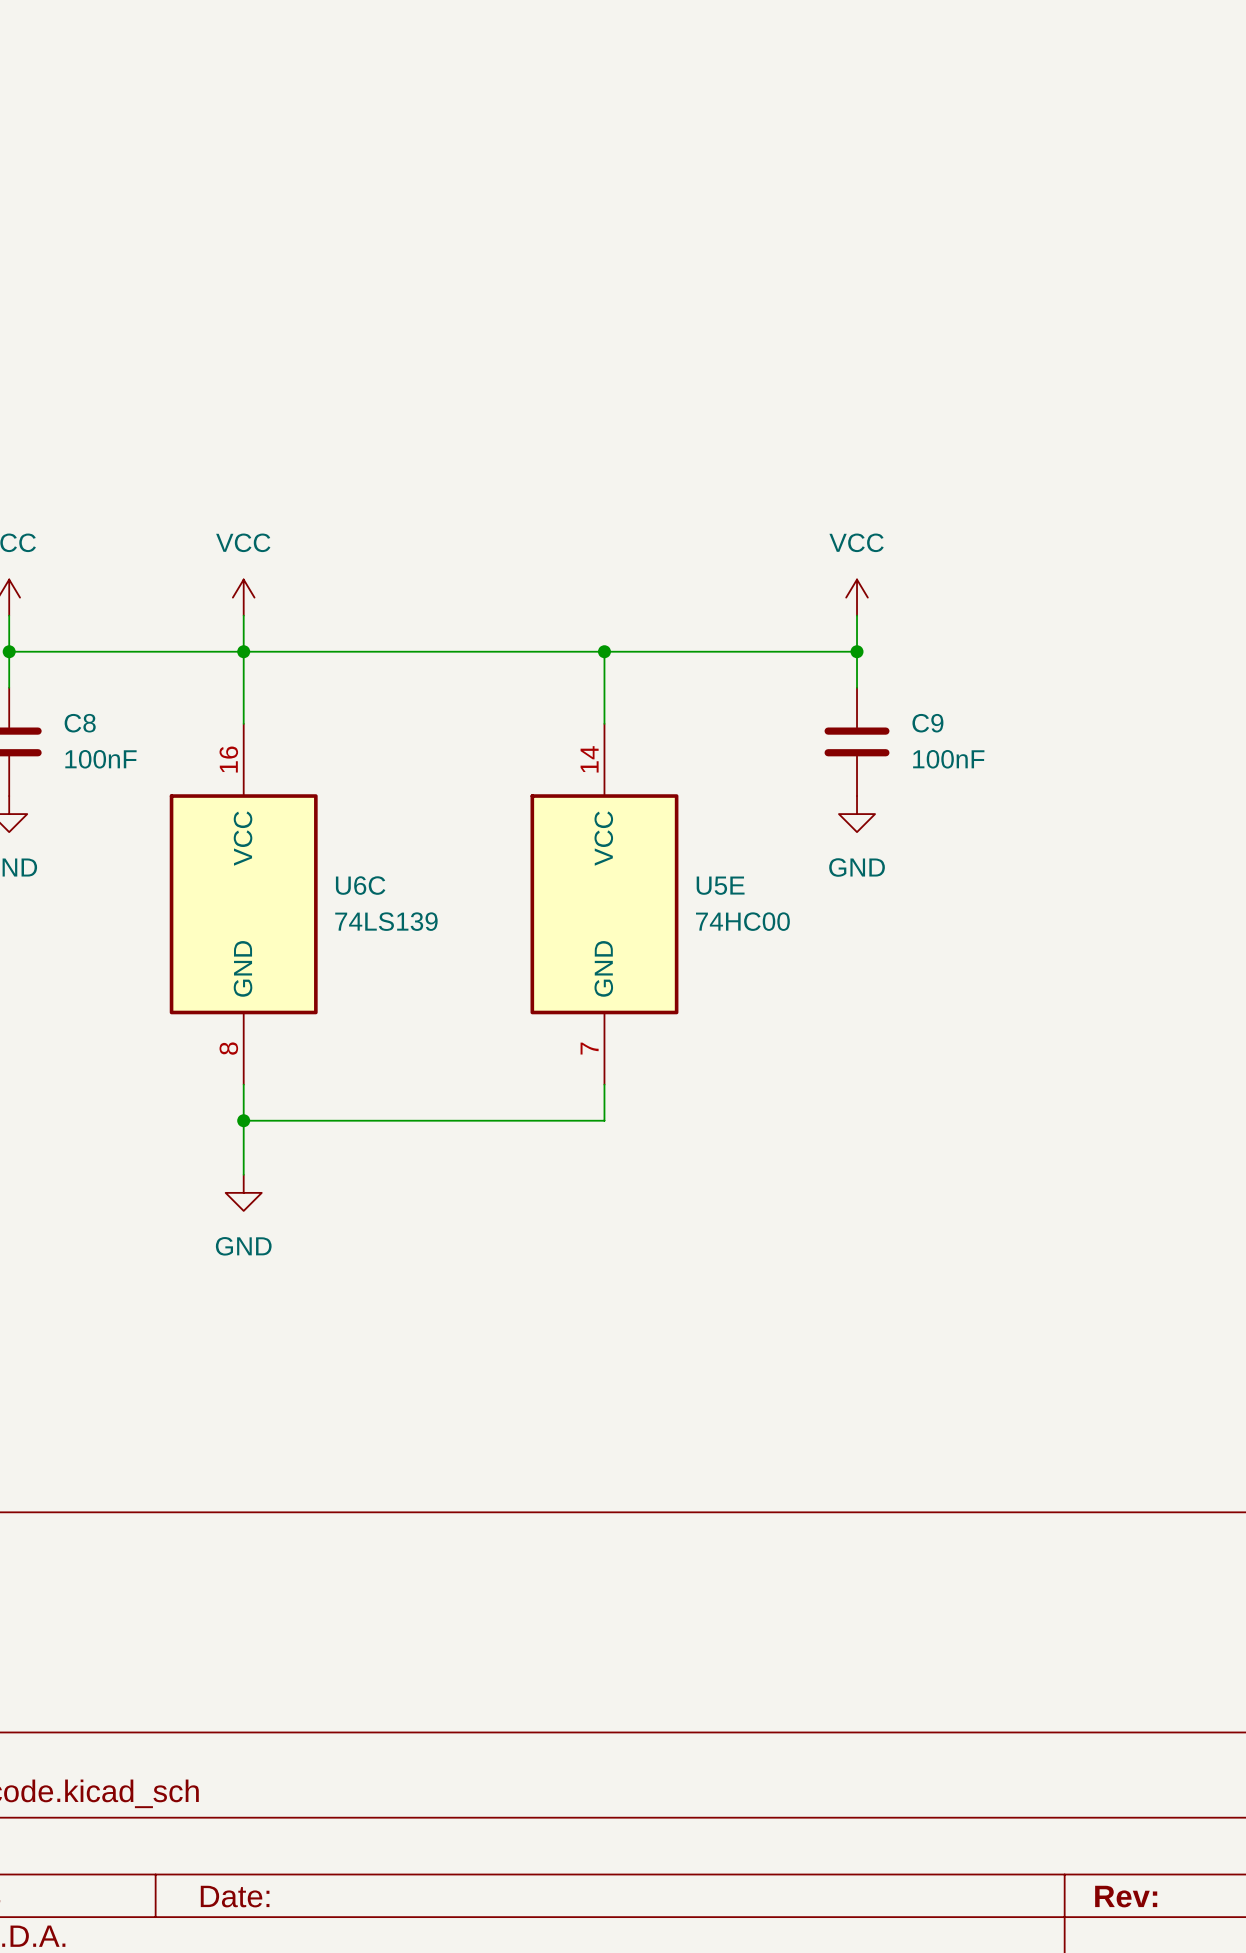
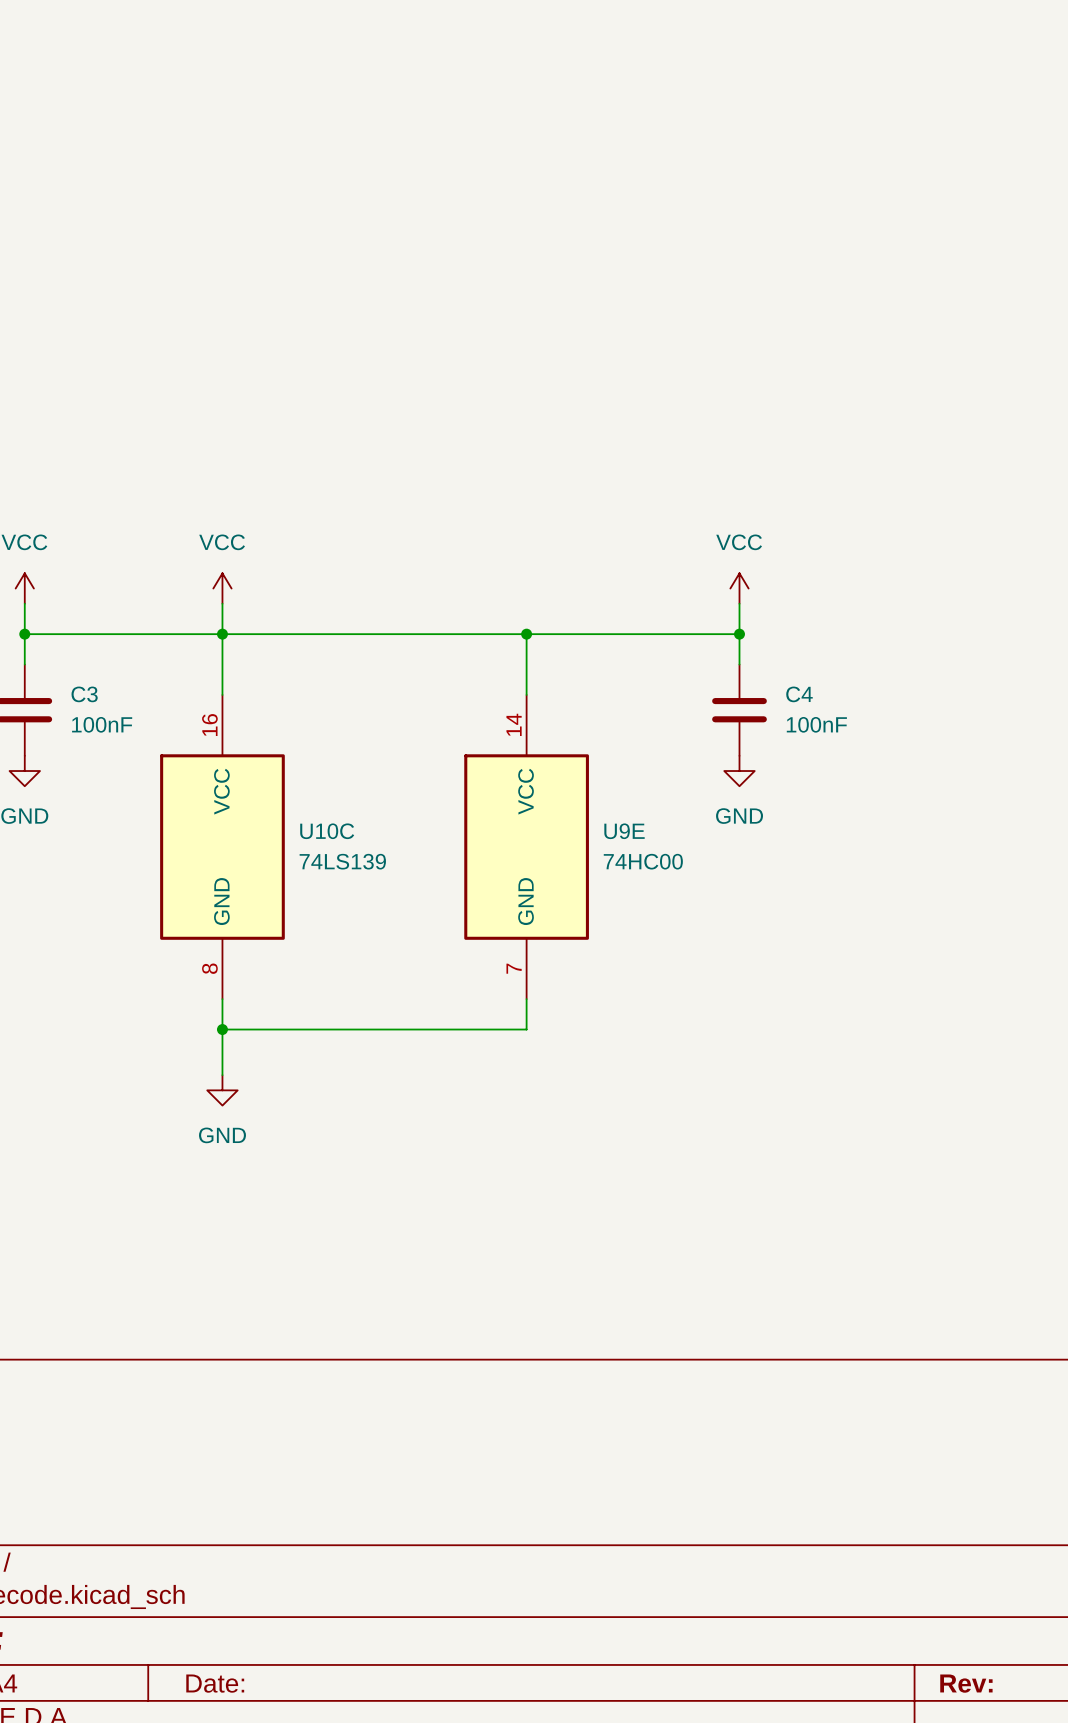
C8 name: C8 (80, 723) -> C3 (84, 694)
C9 name: C9 (927, 723) -> C4 (799, 694)
U6C name: U6C (360, 885) -> U10C (327, 831)
U5E name: U5E (720, 885) -> U9E (624, 831)

